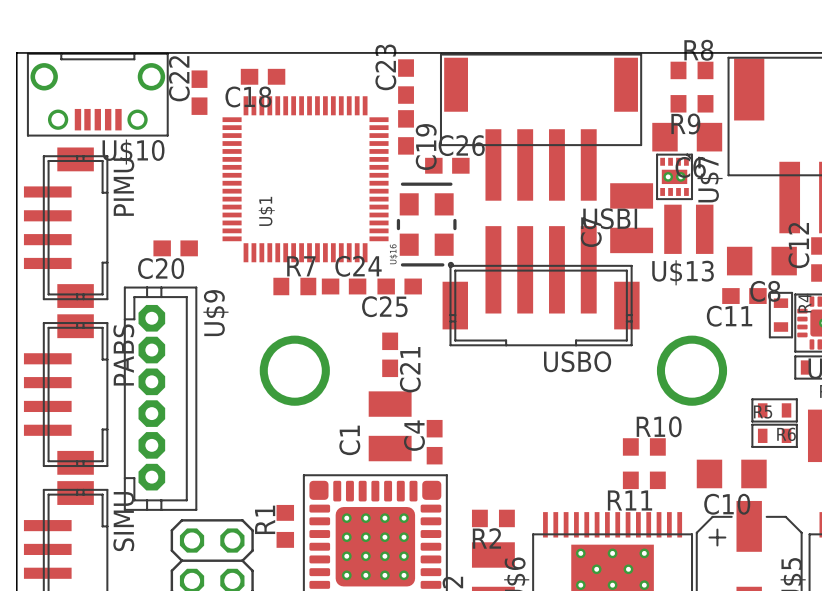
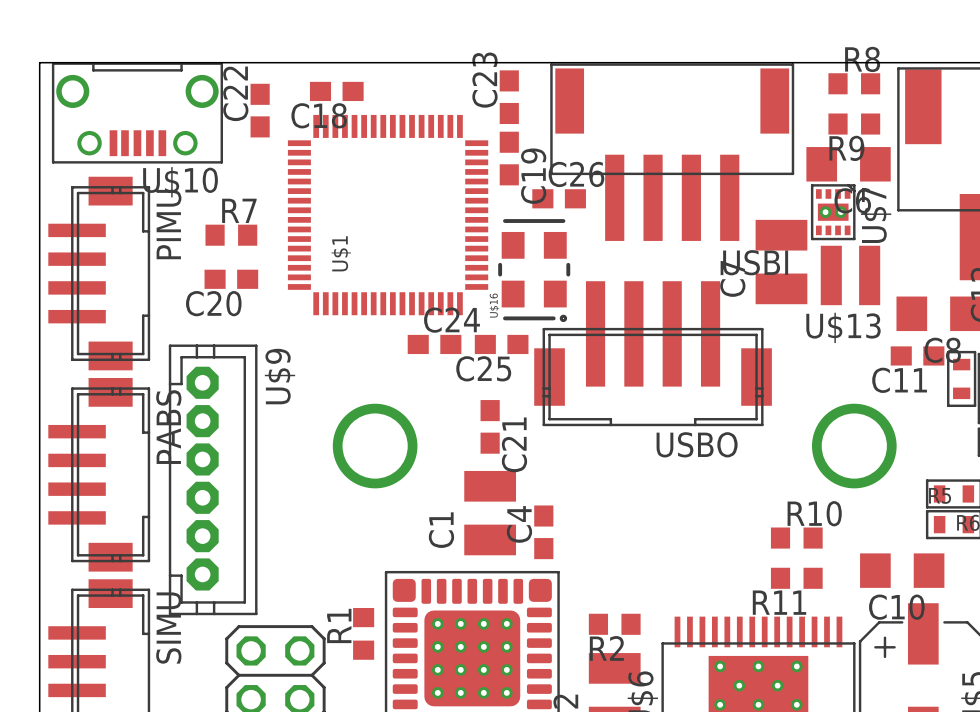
C20 position: (175, 248) -> (231, 279)
R7 position: (294, 286) -> (231, 235)
USBO position: (541, 286) -> (653, 353)

